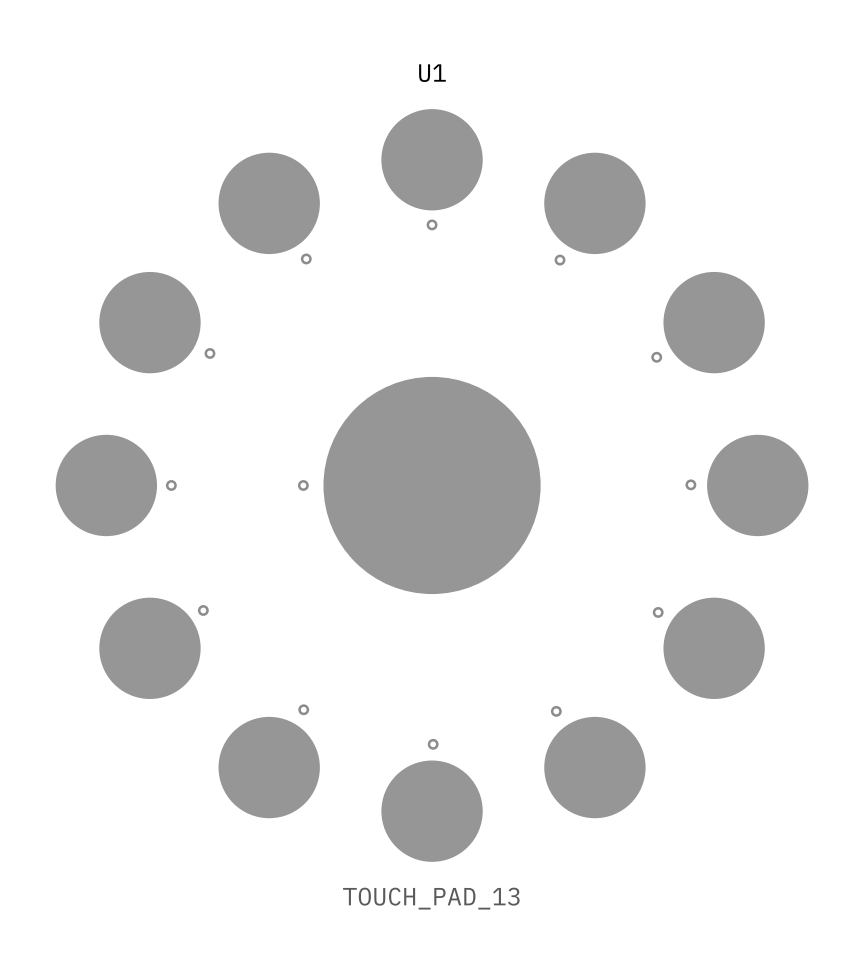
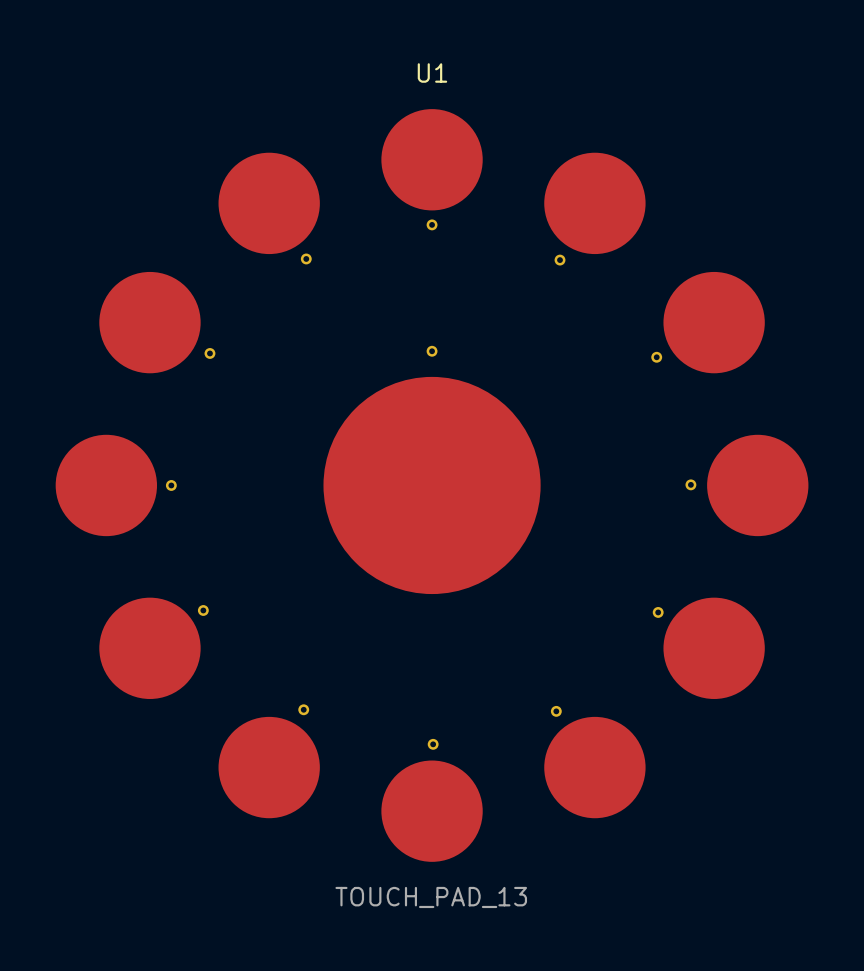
U1 footprint: [55, 109, 809, 862] -> [55, 109, 809, 862]

